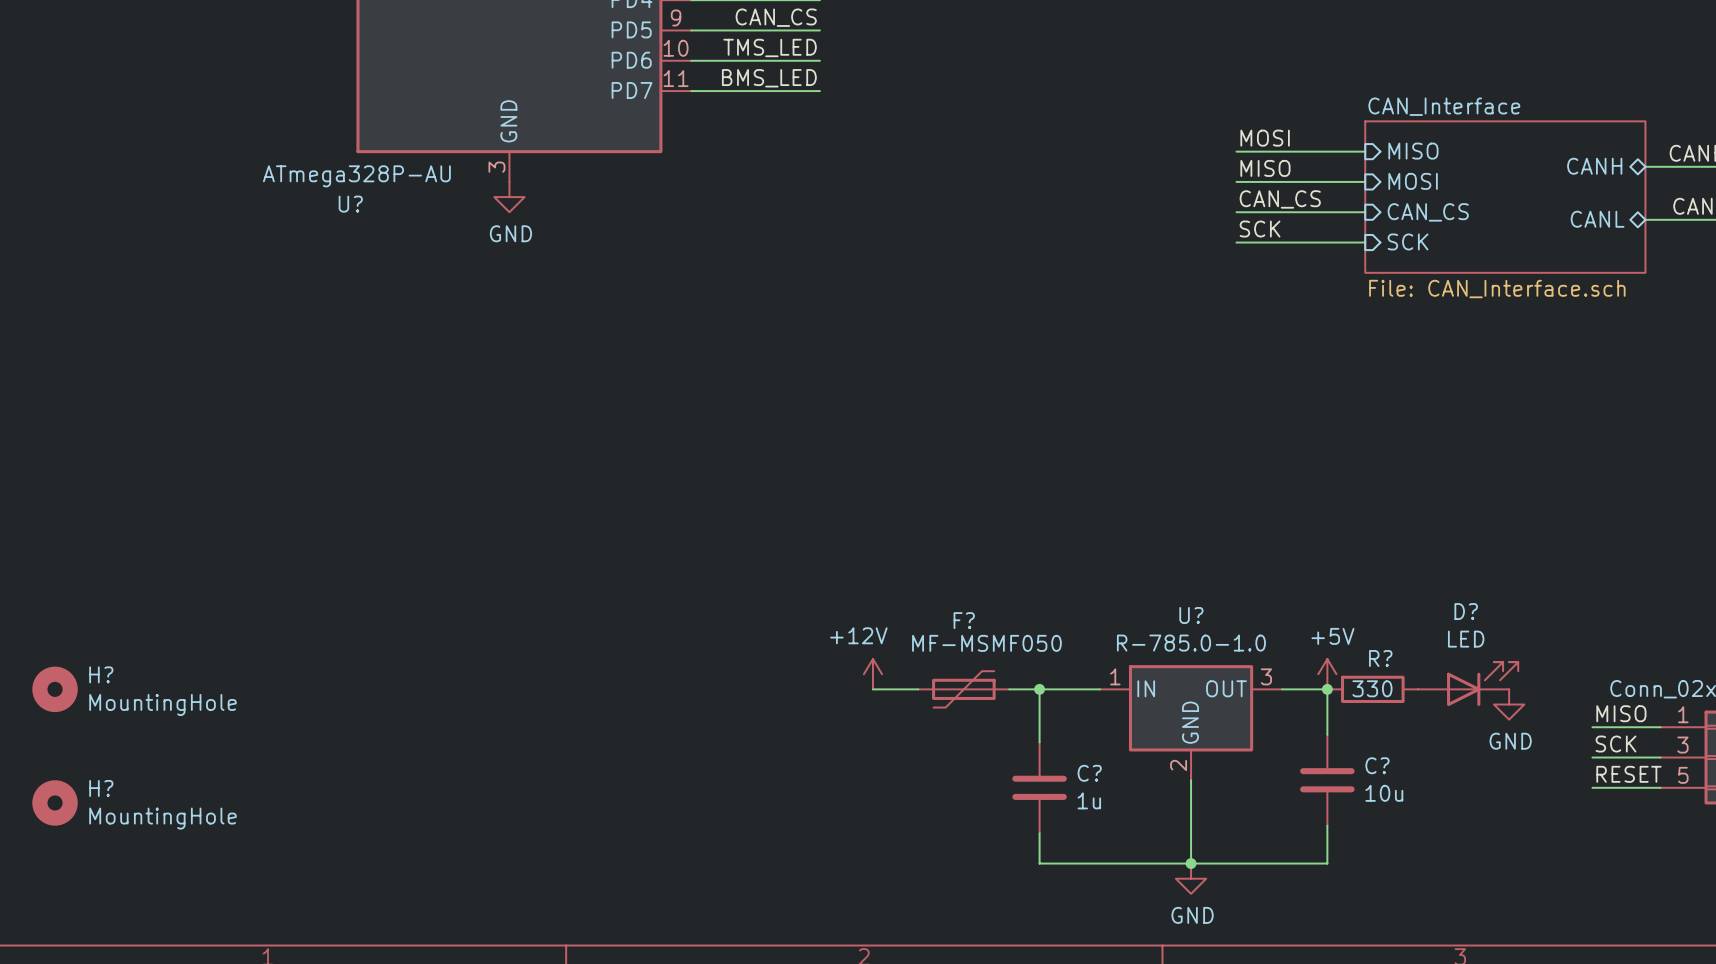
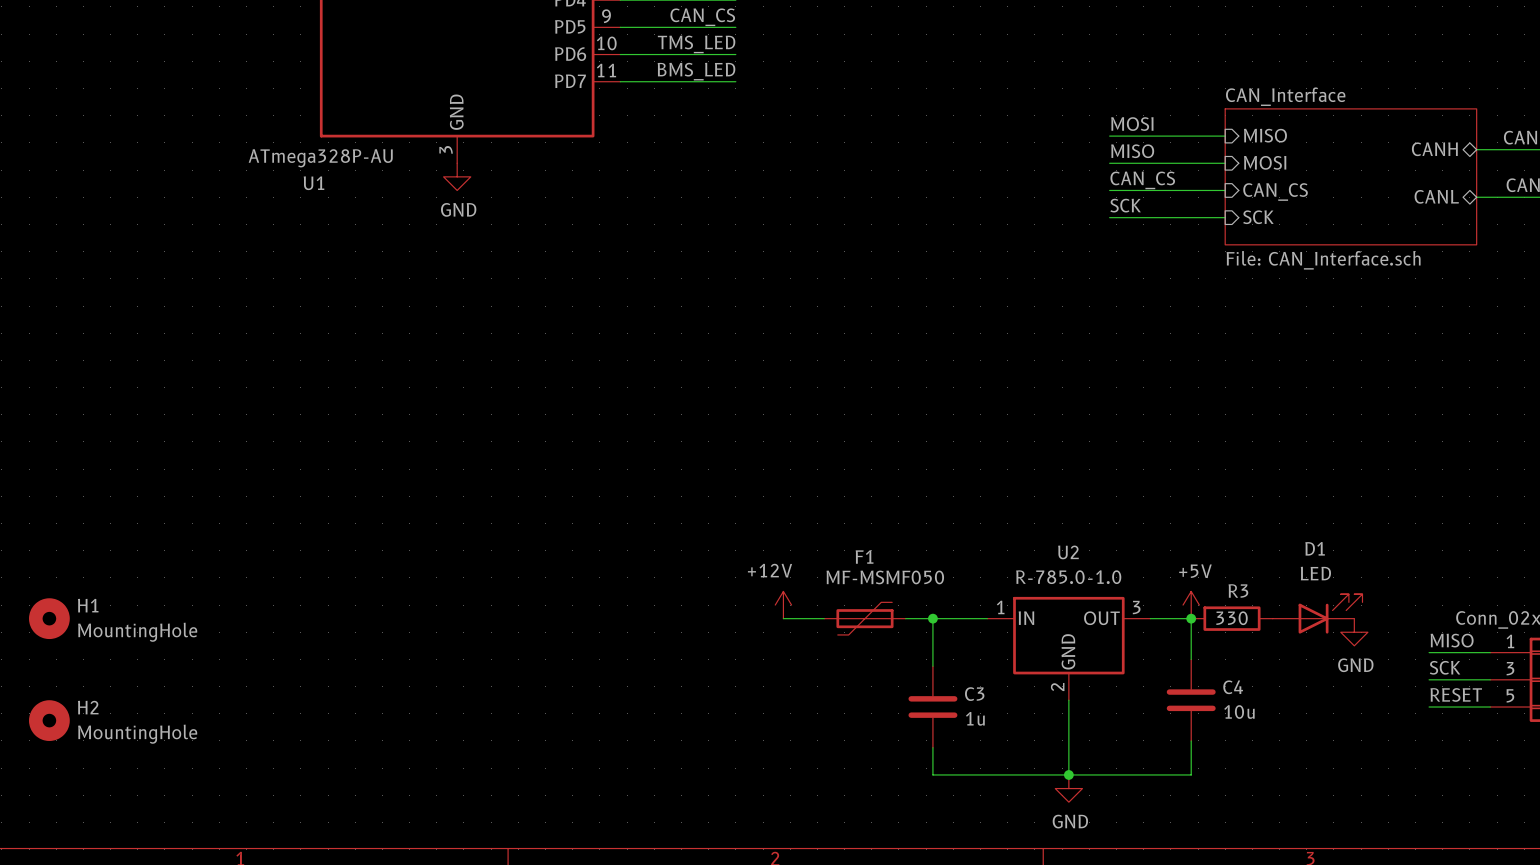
U? name: U? (350, 204) -> U1 (314, 183)
D? name: D? (1466, 611) -> D1 (1315, 548)
U? name: U? (1191, 615) -> U2 (1068, 552)
F? name: F? (964, 620) -> F1 (864, 556)
R? name: R? (1380, 658) -> R3 (1238, 590)
H? name: H? (101, 674) -> H1 (88, 605)
C? name: C? (1377, 765) -> C4 (1233, 687)
C? name: C? (1089, 773) -> C3 (974, 694)
H? name: H? (101, 788) -> H2 (88, 707)

